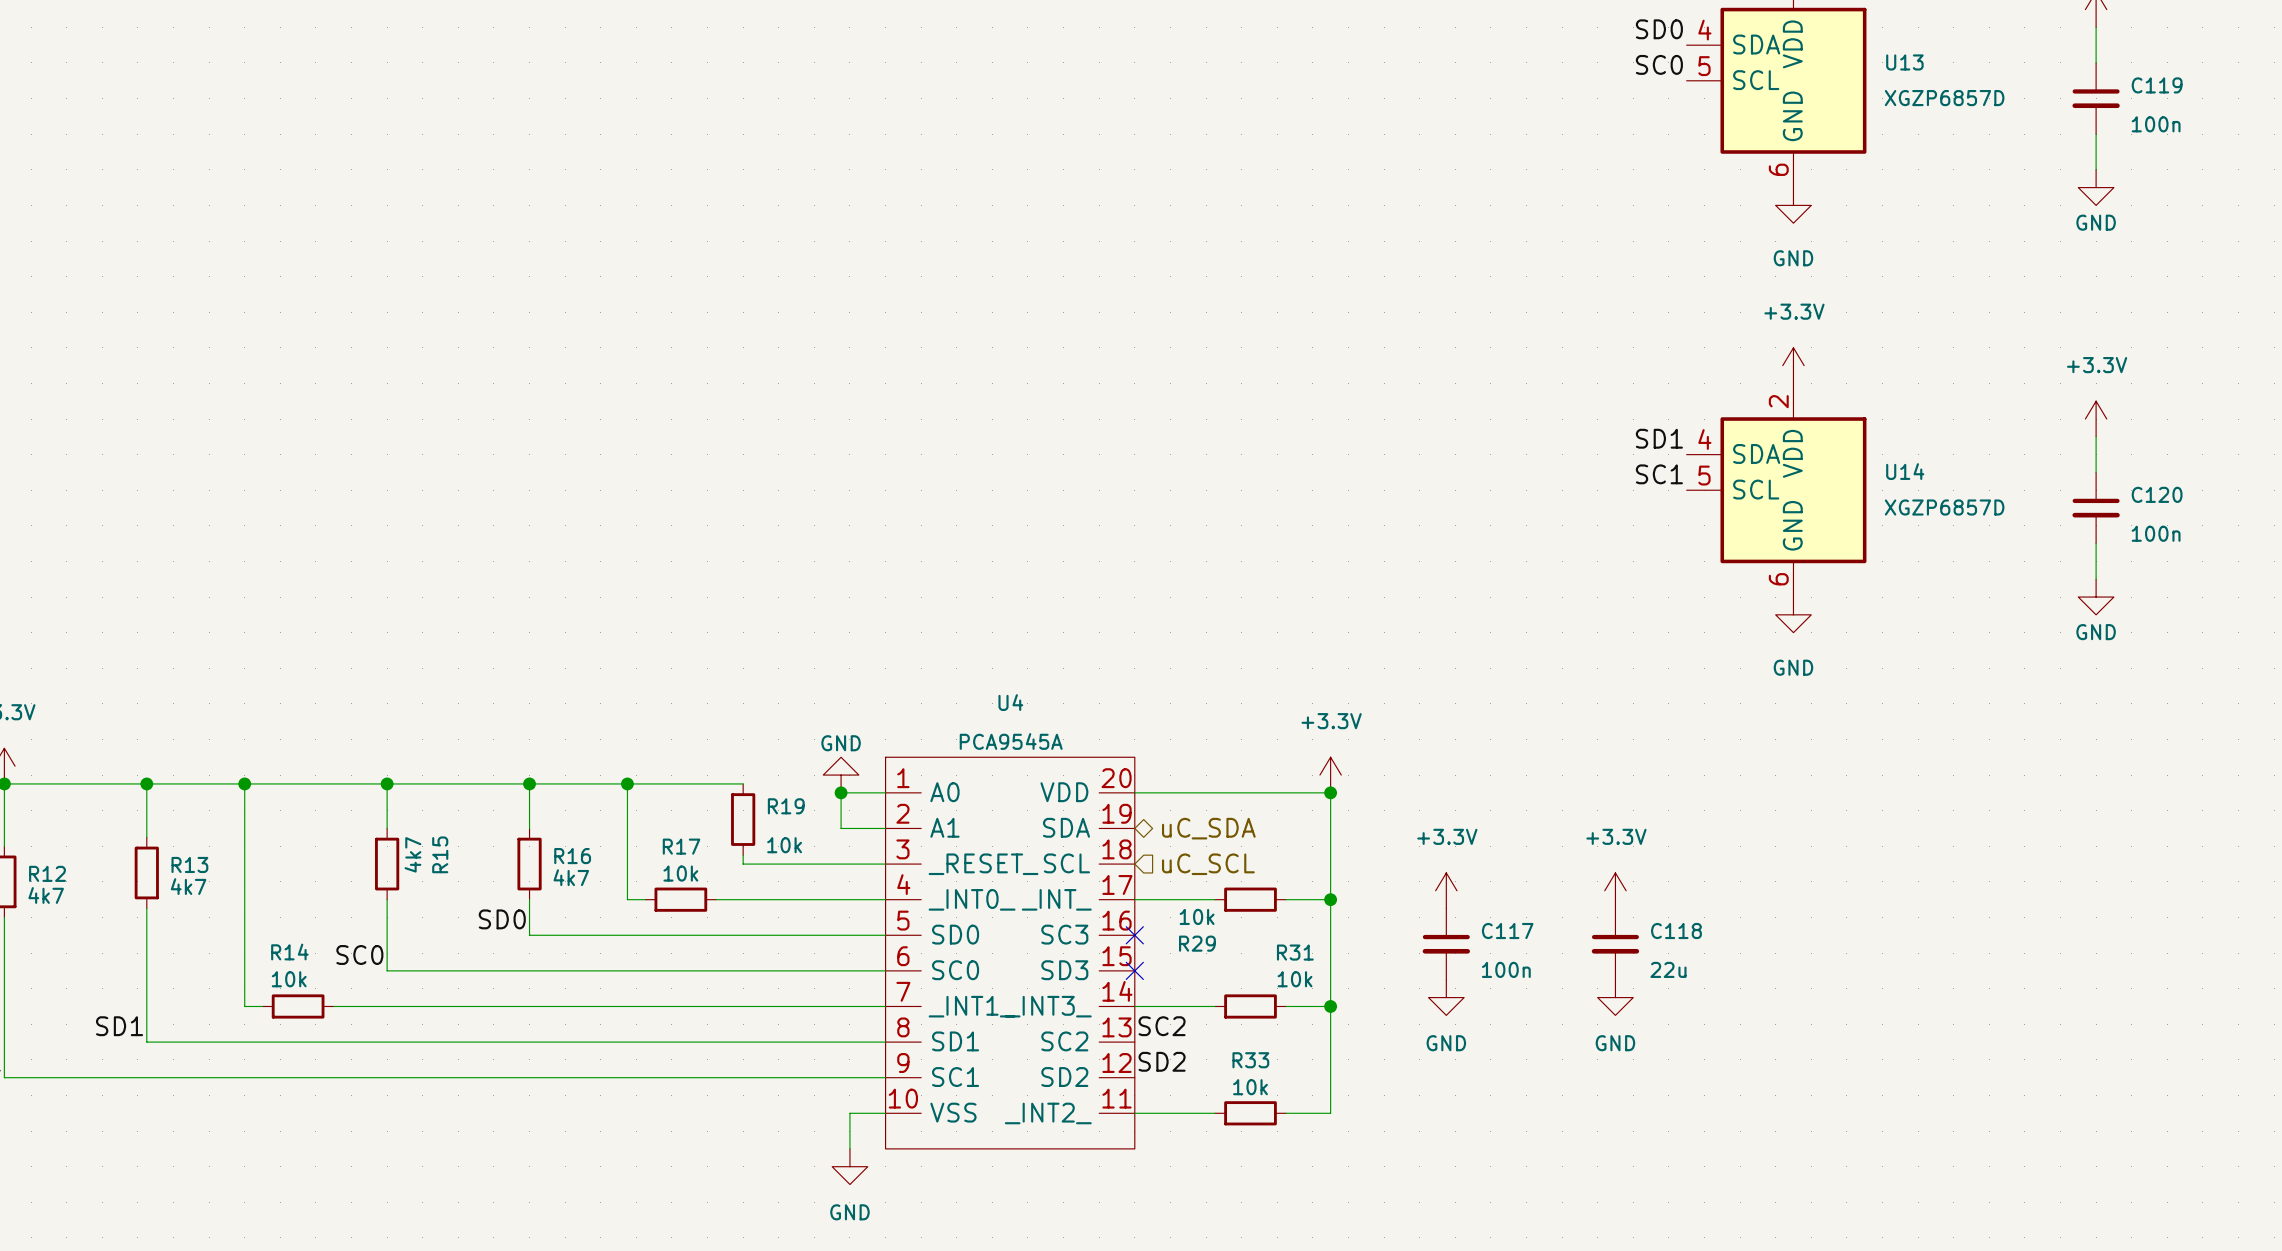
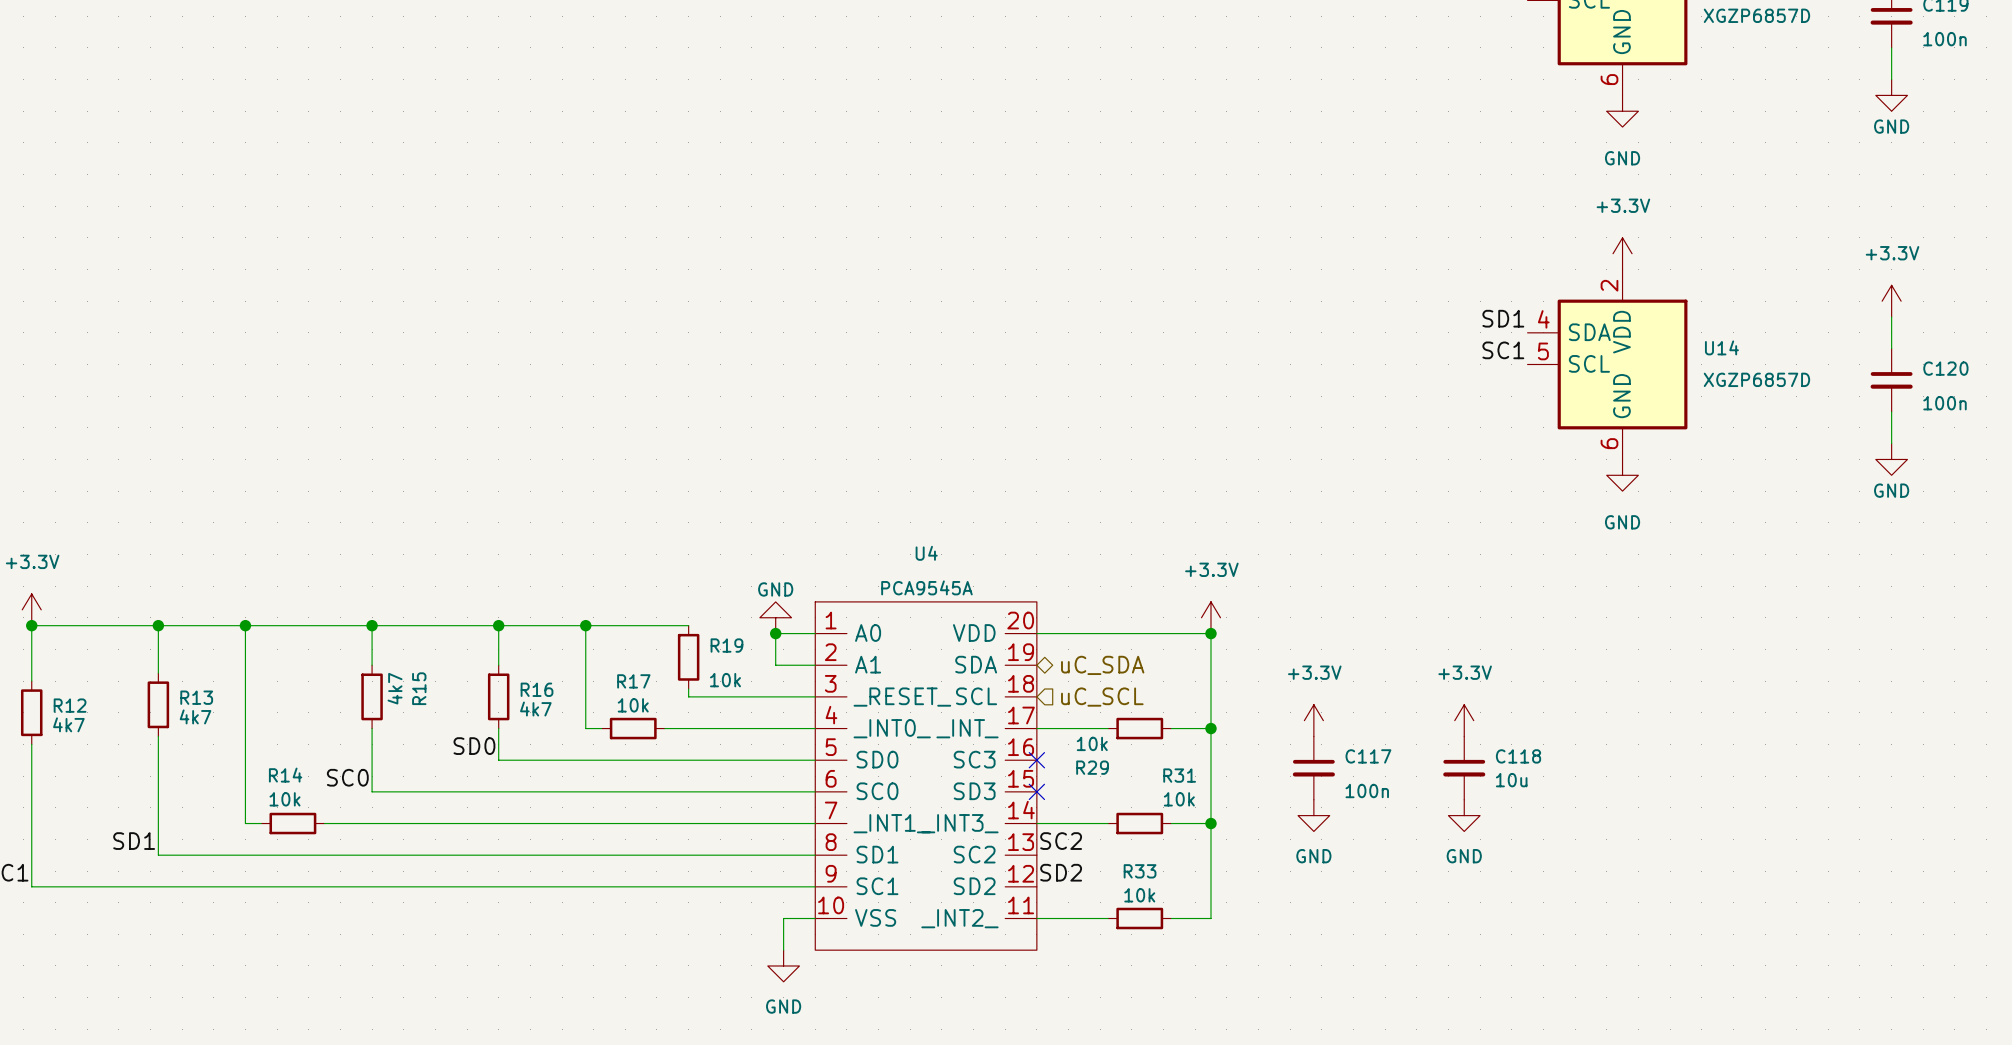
C118 value: 22u (1668, 969) -> 10u (1511, 780)

